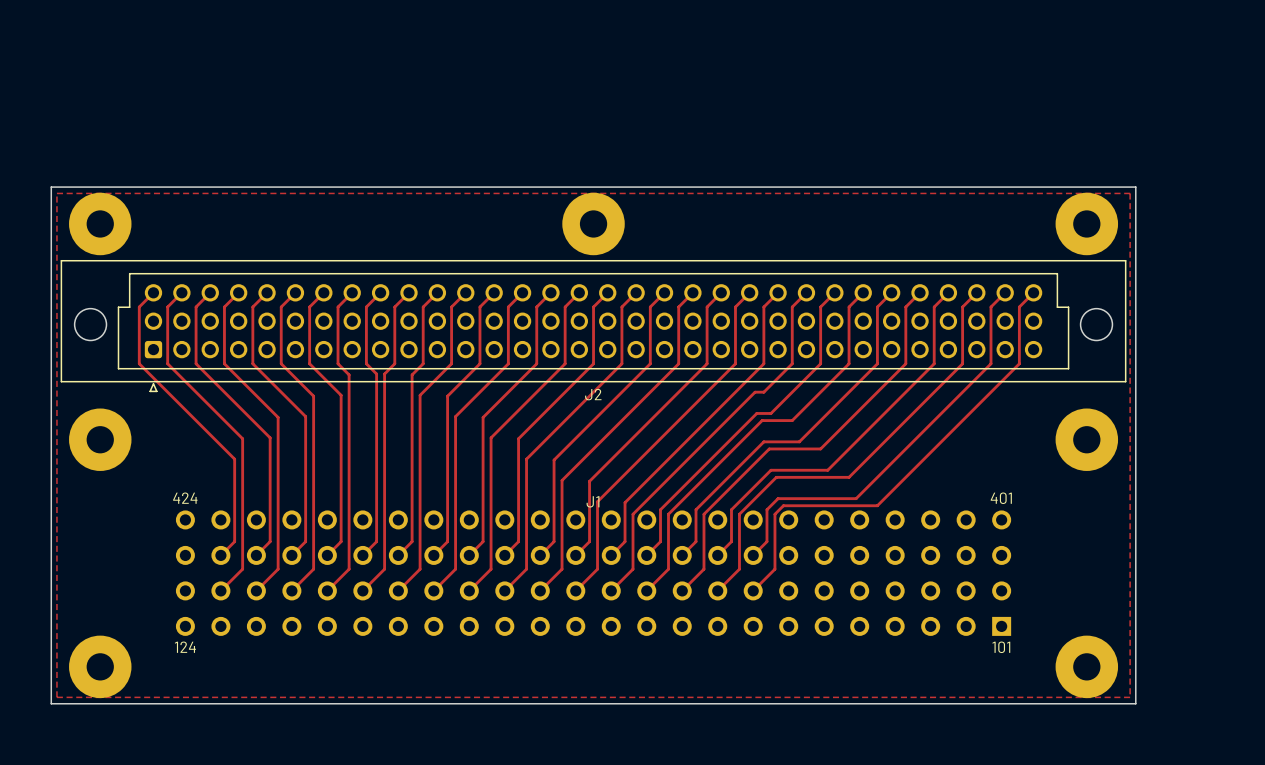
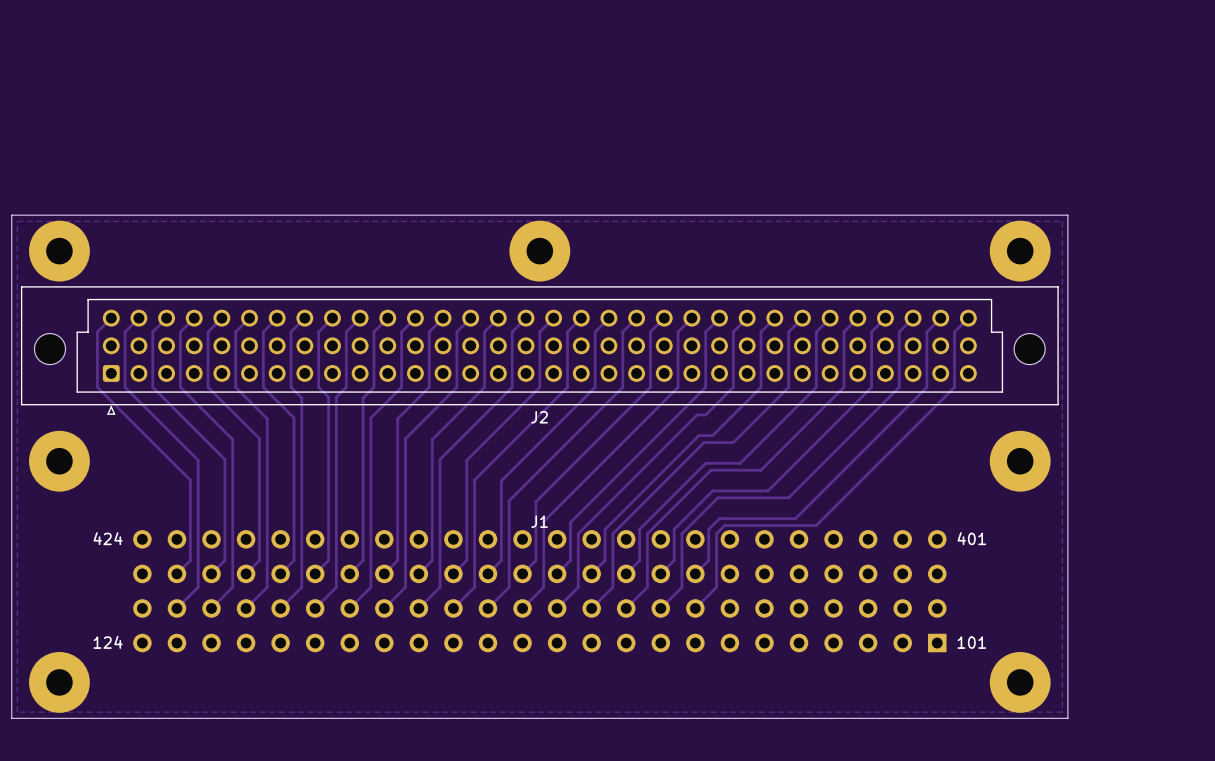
J1 text position: 424 (185, 498) -> 424 (108, 538)
J1 text position: 401 (1001, 498) -> 401 (971, 538)
J1 text position: 124 (185, 647) -> 124 (108, 642)
J1 text position: 101 (1001, 647) -> 101 (971, 642)

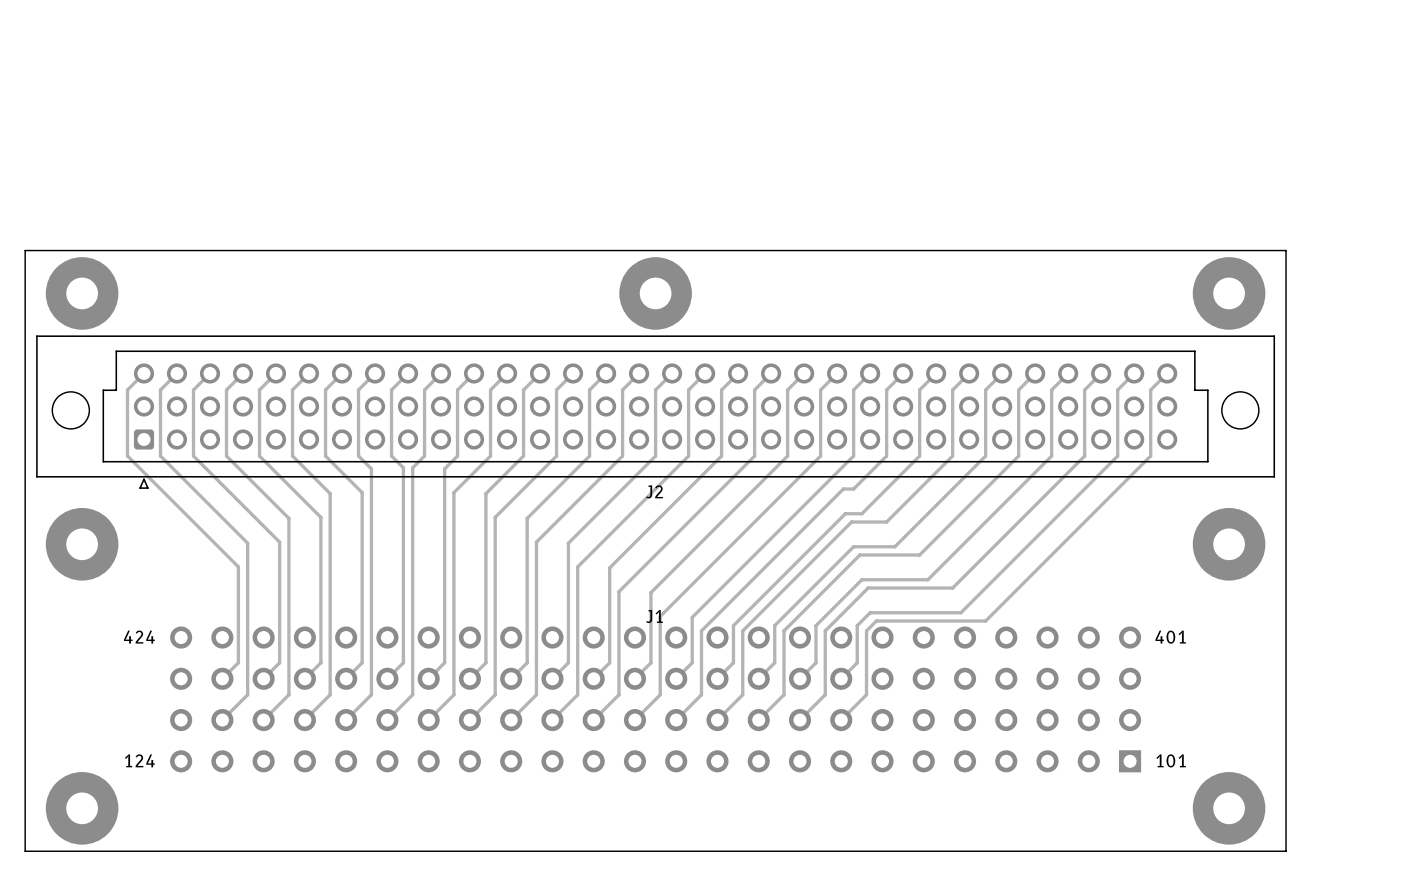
zone outline: (17, 221) (17, 712) (1062, 712) (1062, 221) (17, 221) -> none

